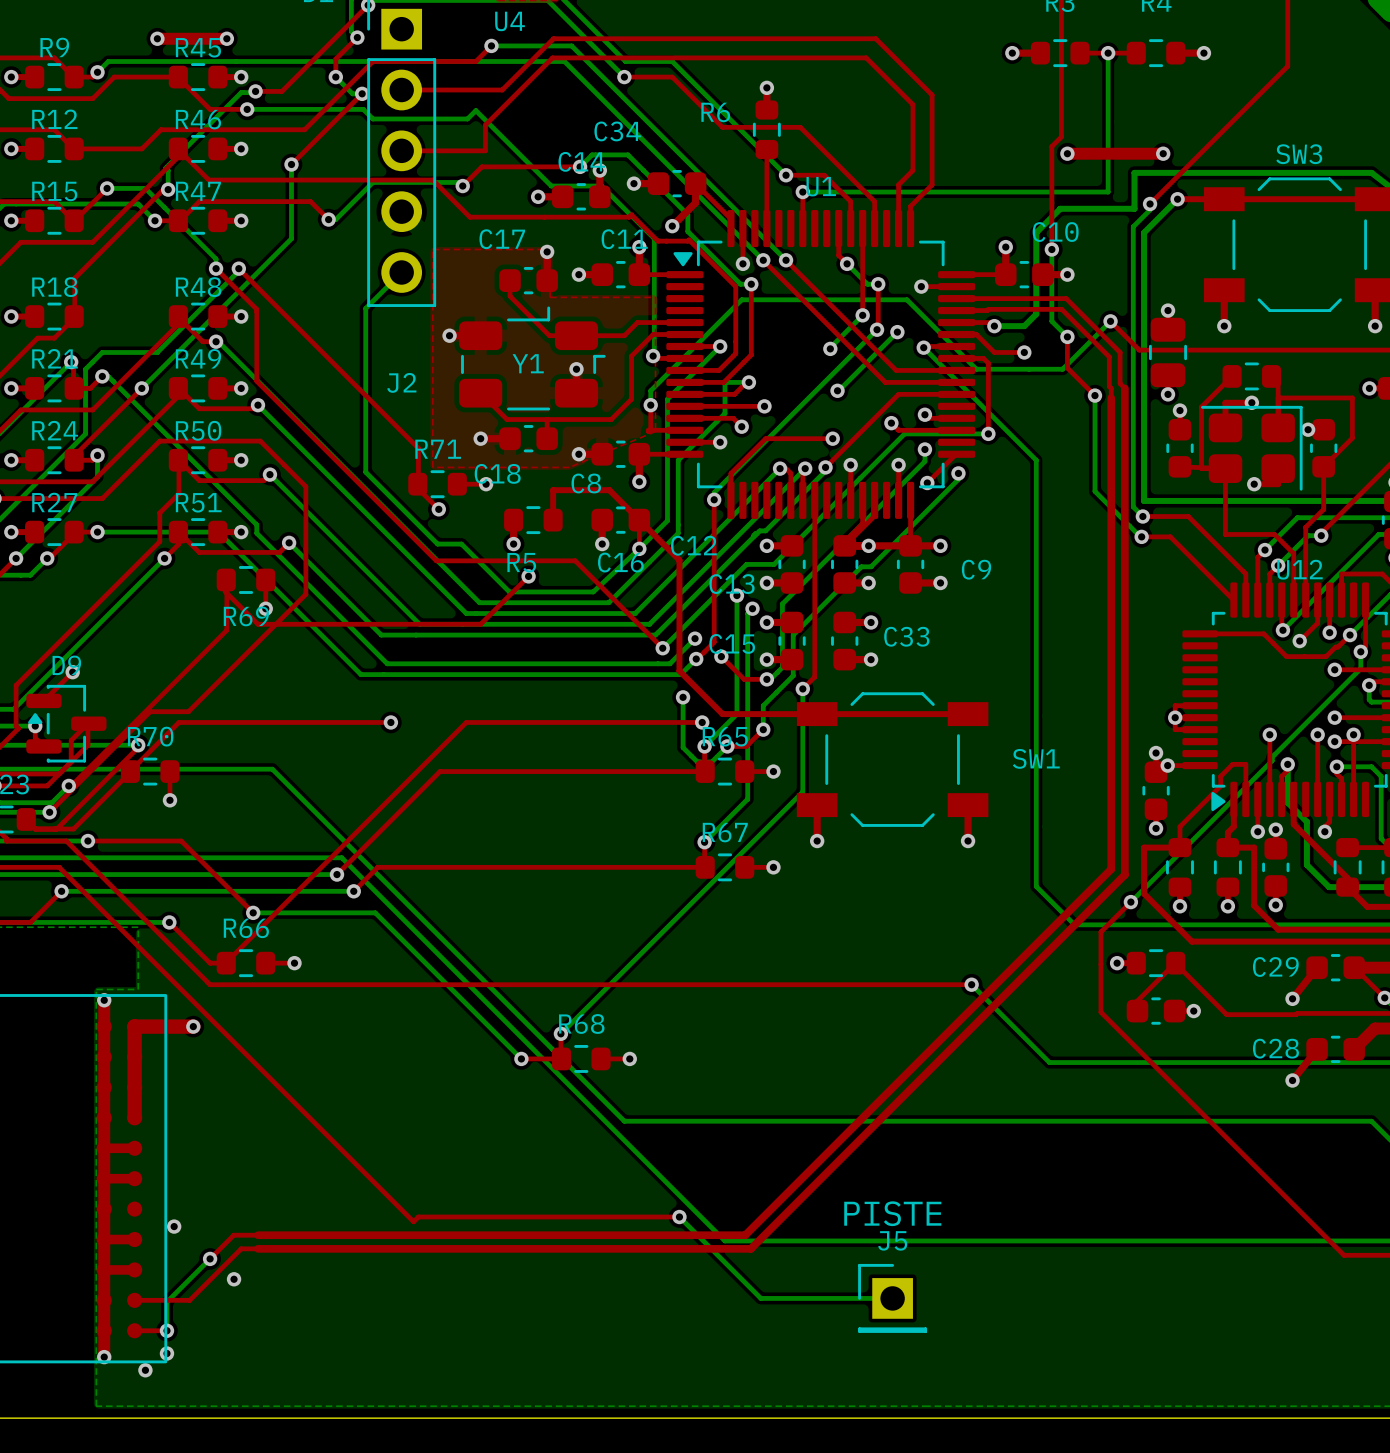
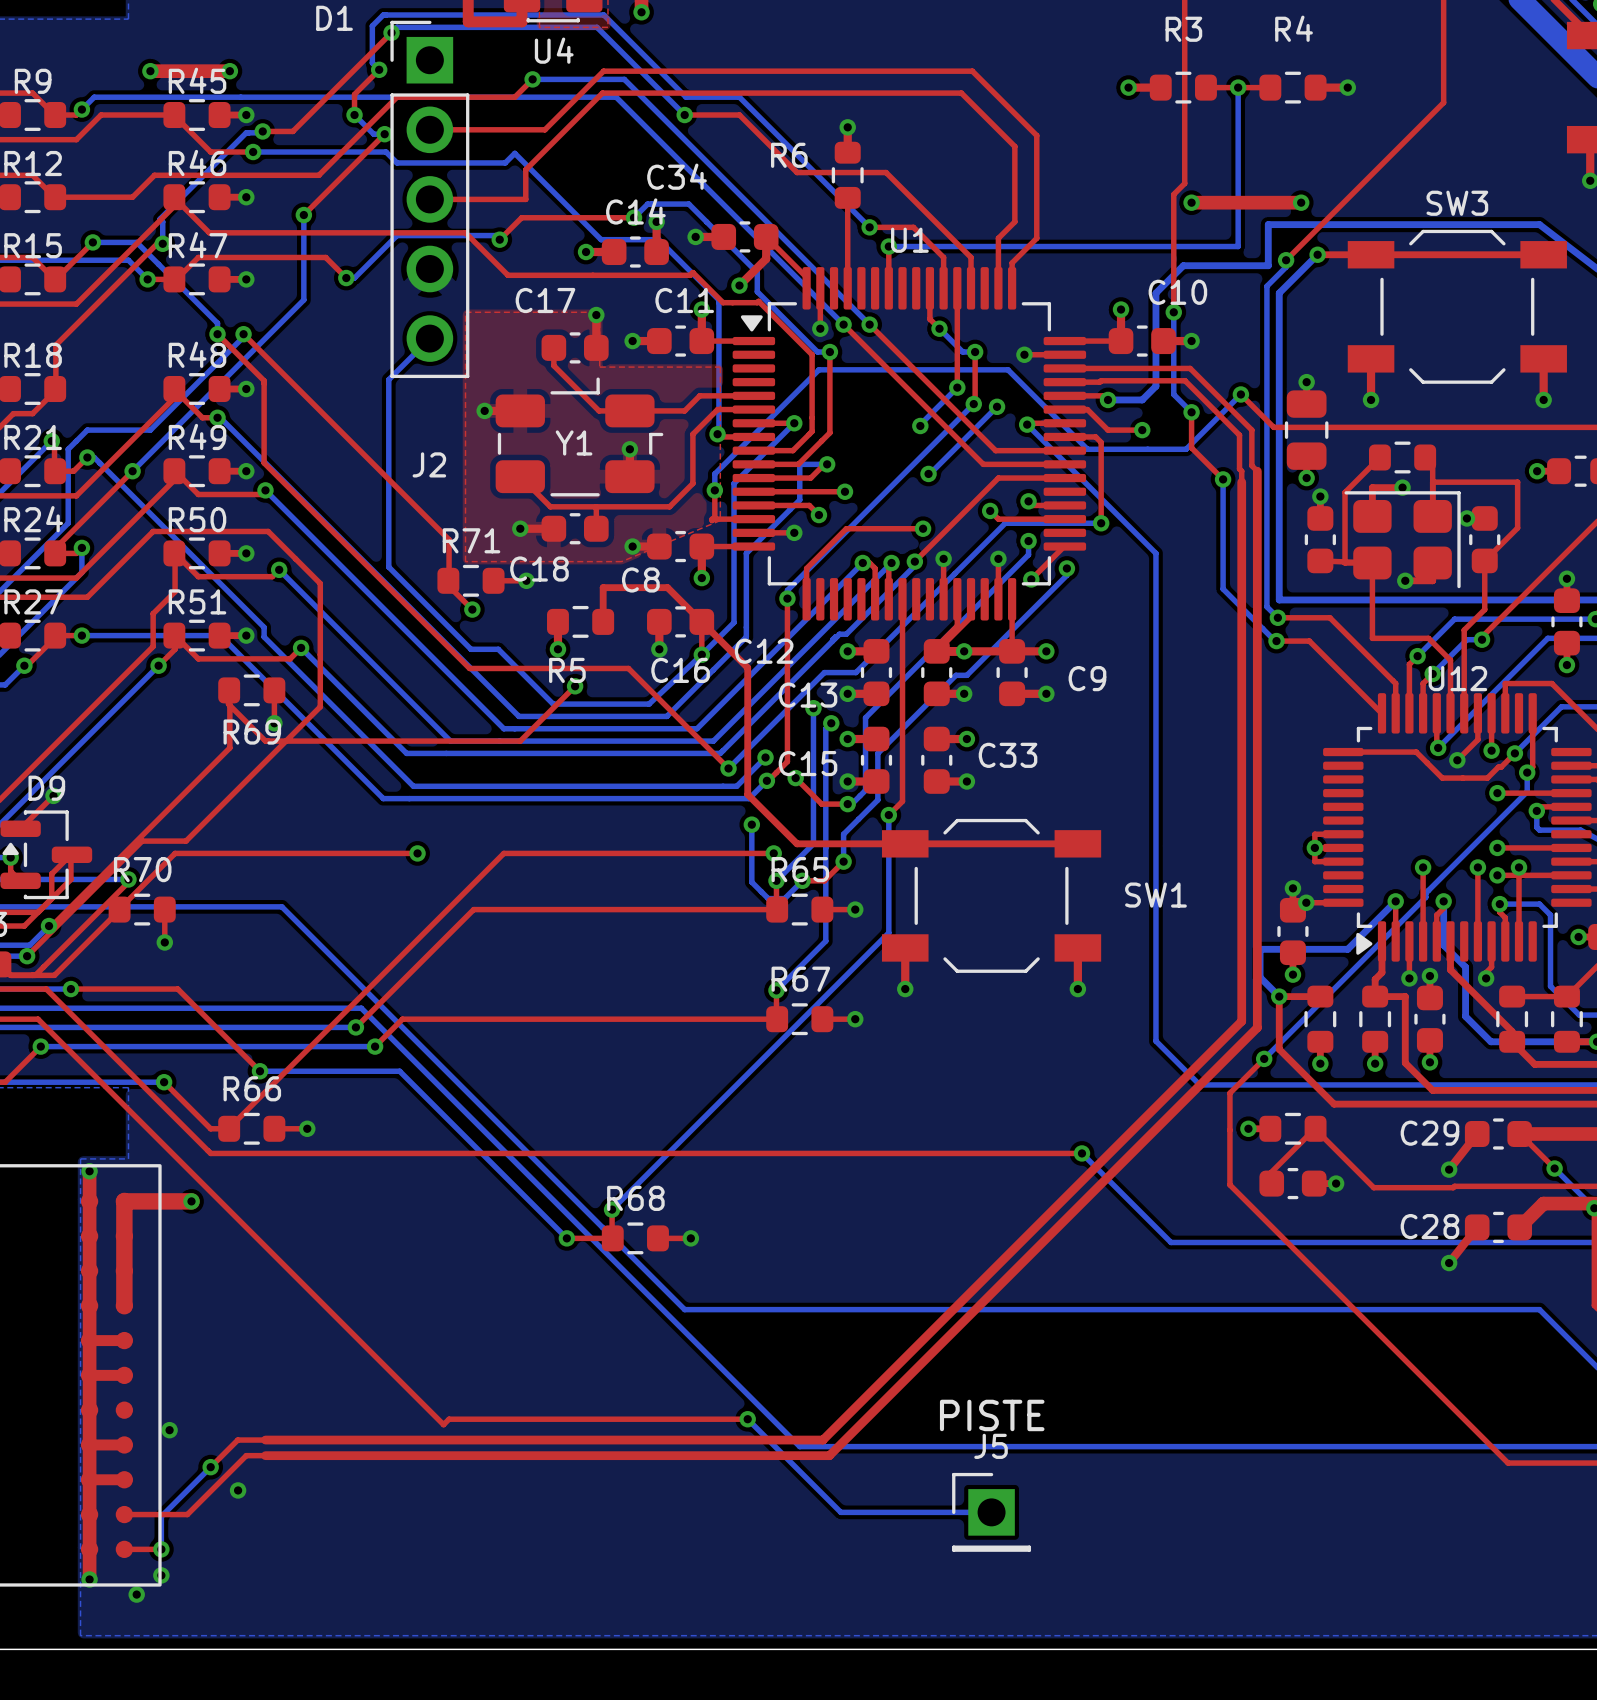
bottom track: none -> (1395, 901) (1347, 949) (1260, 949) (1260, 977) (1279, 996)
top track: (1245, 764) (1232, 764) (1220, 776) (1220, 785) (1179, 826) (1179, 847) -> none
via: none -> (1395, 901)
via: none -> (1279, 996)

